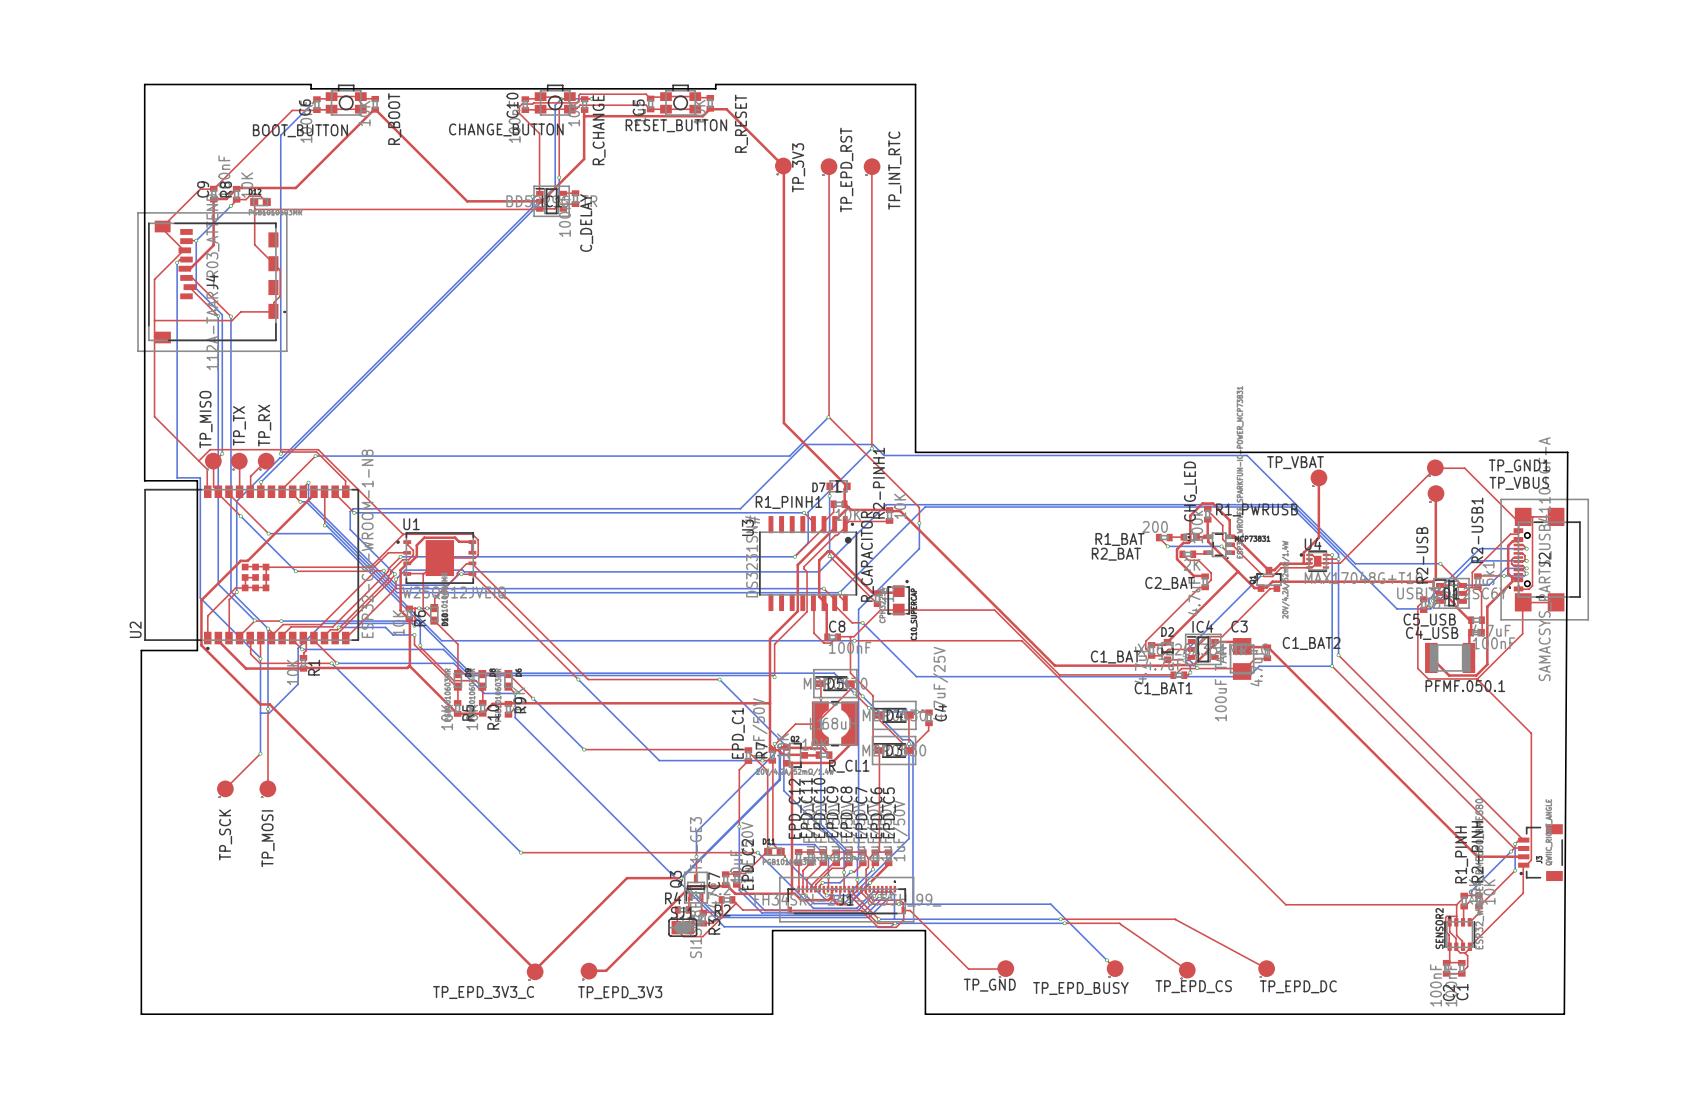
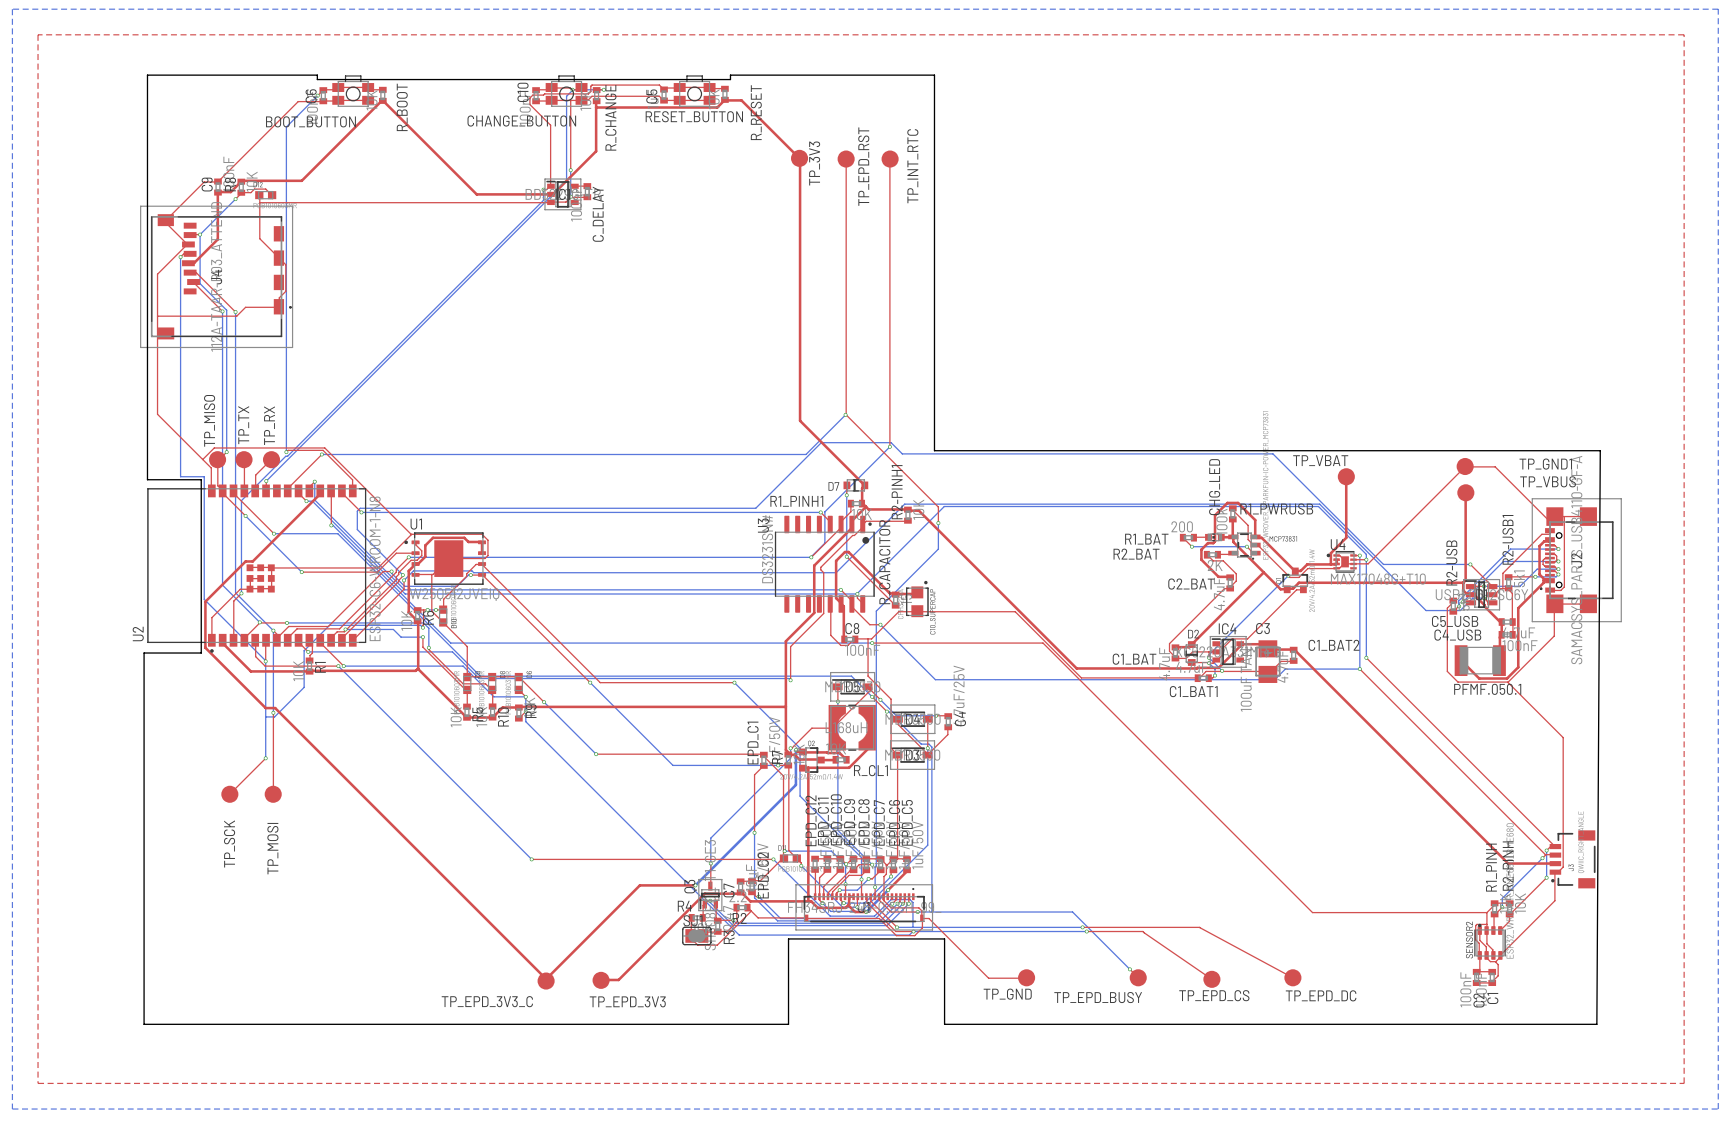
bottom zone outline: none -> (12, 9) (1718, 9) (1718, 1109) (12, 1109) (12, 9)
top zone outline: none -> (38, 34) (1684, 34) (1684, 1083) (38, 1083) (38, 34)

